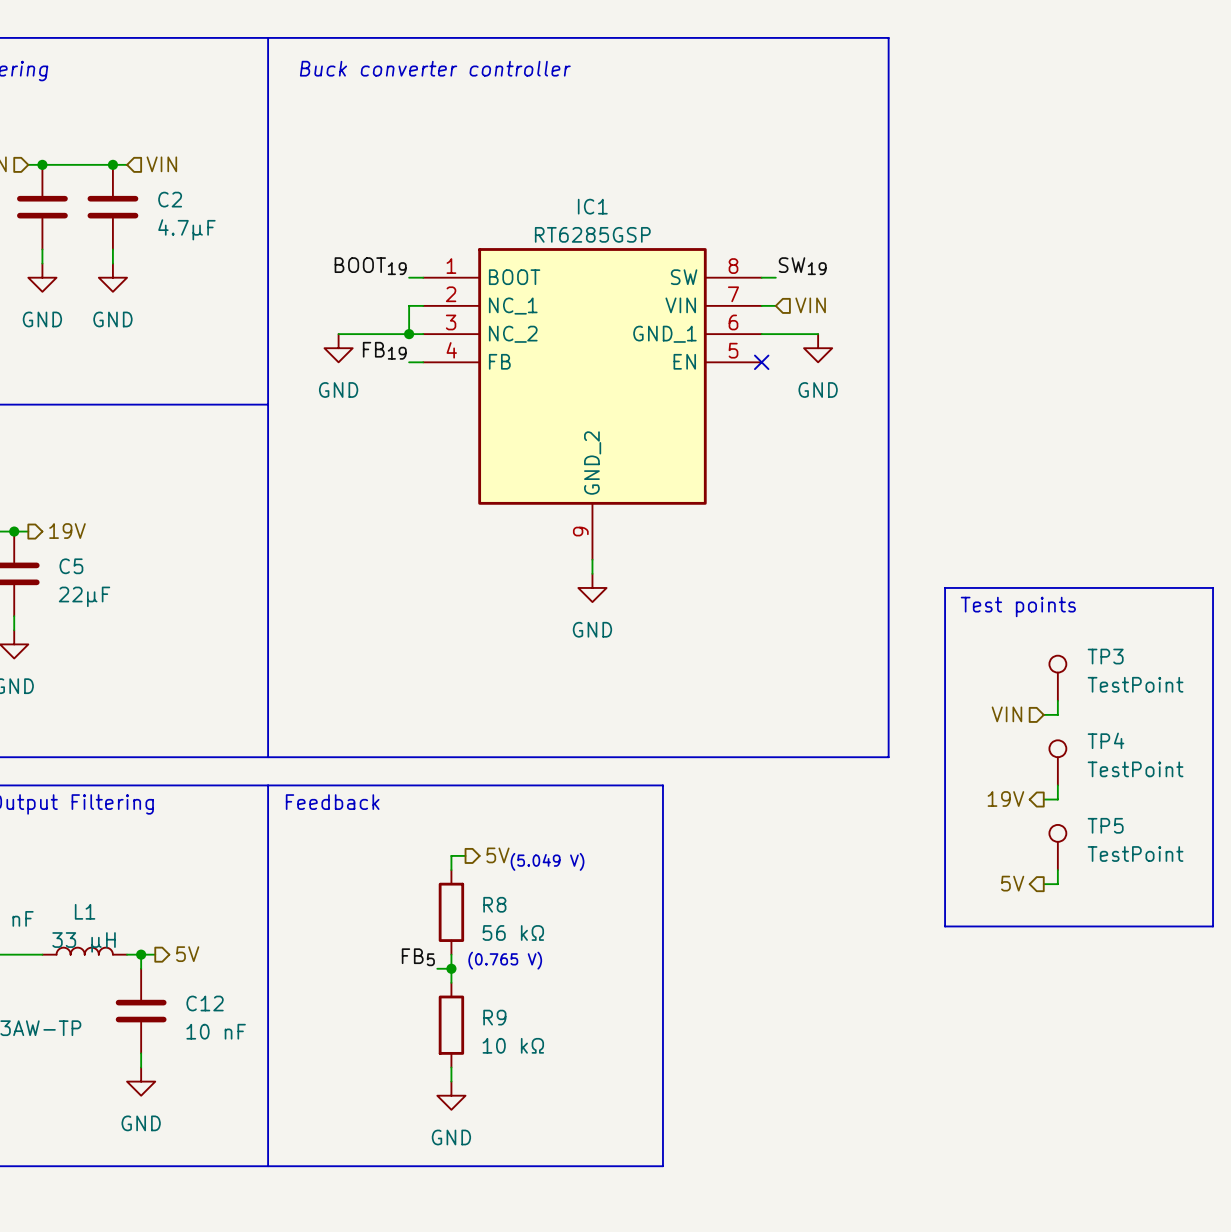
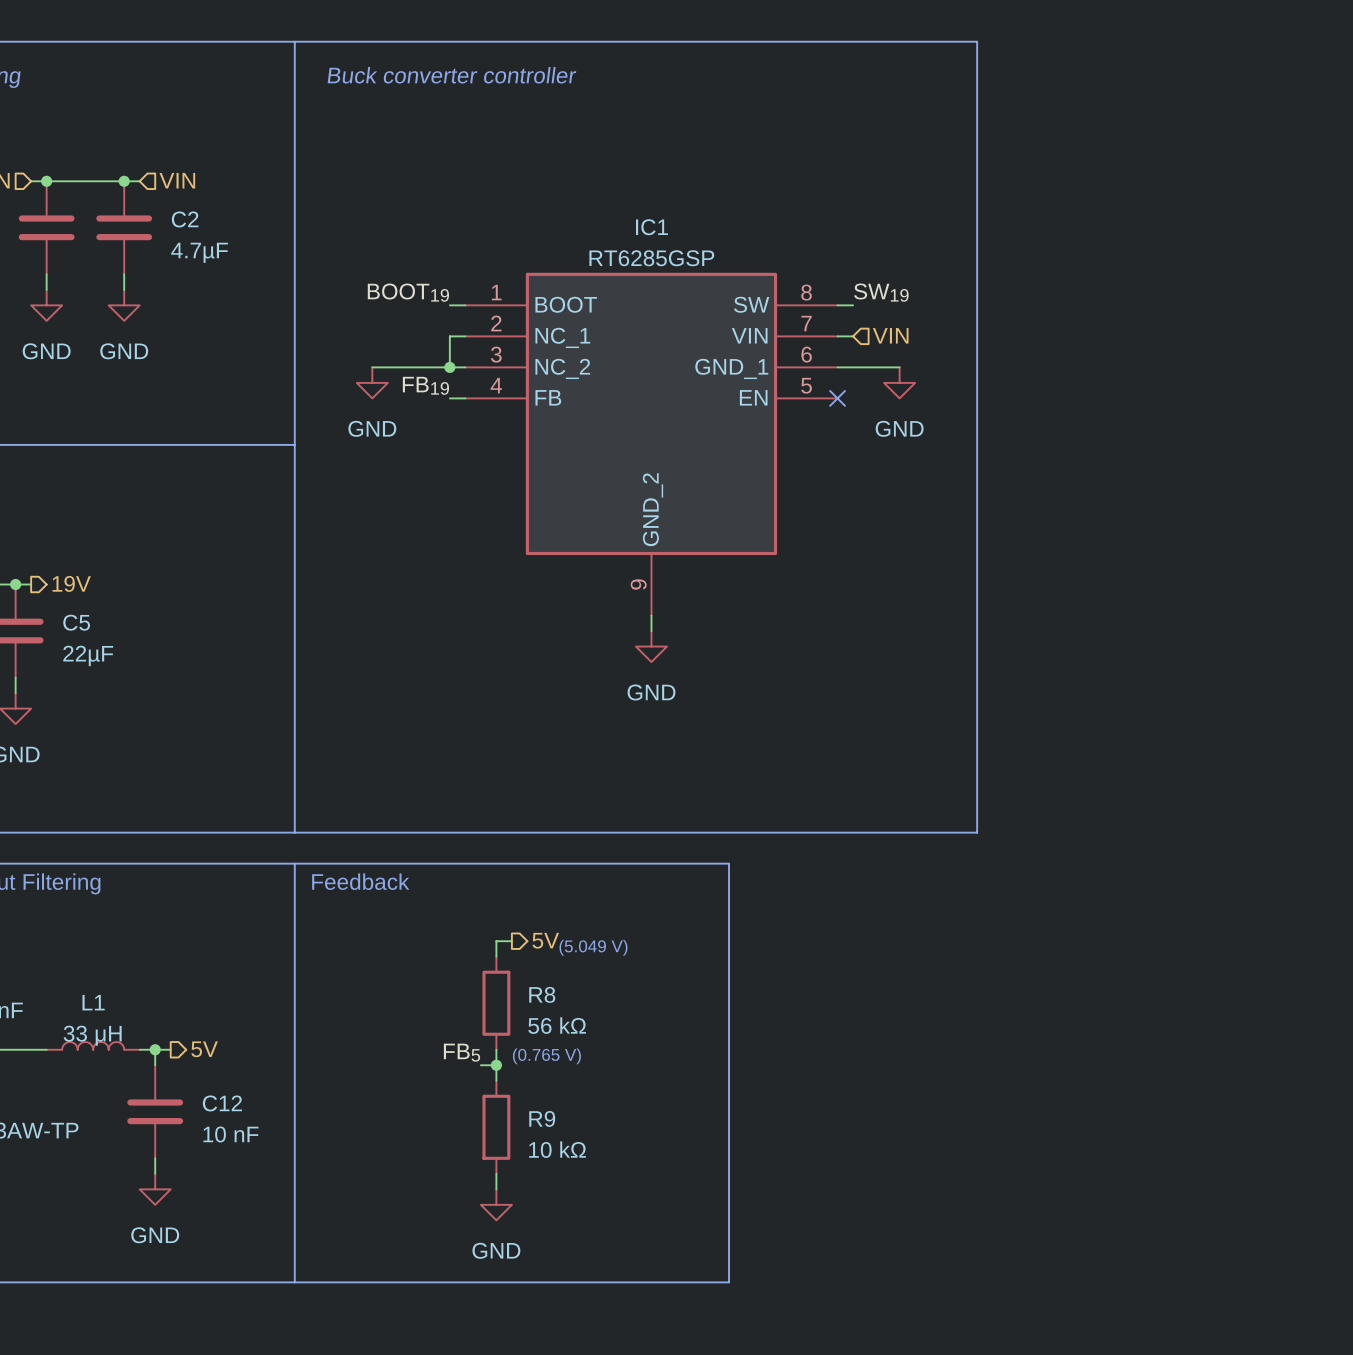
line: (945, 587) (945, 926) (1213, 926) (1213, 587) (945, 587) -> none
text: Test points (1018, 606) -> none
TP3: TestPoint (1057, 678) -> none
wire: (1057, 700) (1057, 714) (1043, 714) -> none
hierarchical label: VIN (1006, 714) -> none
TP4: TestPoint (1057, 762) -> none
wire: (1057, 785) (1057, 799) (1043, 799) -> none
hierarchical label: 19V (1005, 799) -> none
TP5: TestPoint (1057, 847) -> none
wire: (1057, 870) (1057, 884) (1043, 884) -> none
hierarchical label: 5V (1012, 883) -> none

